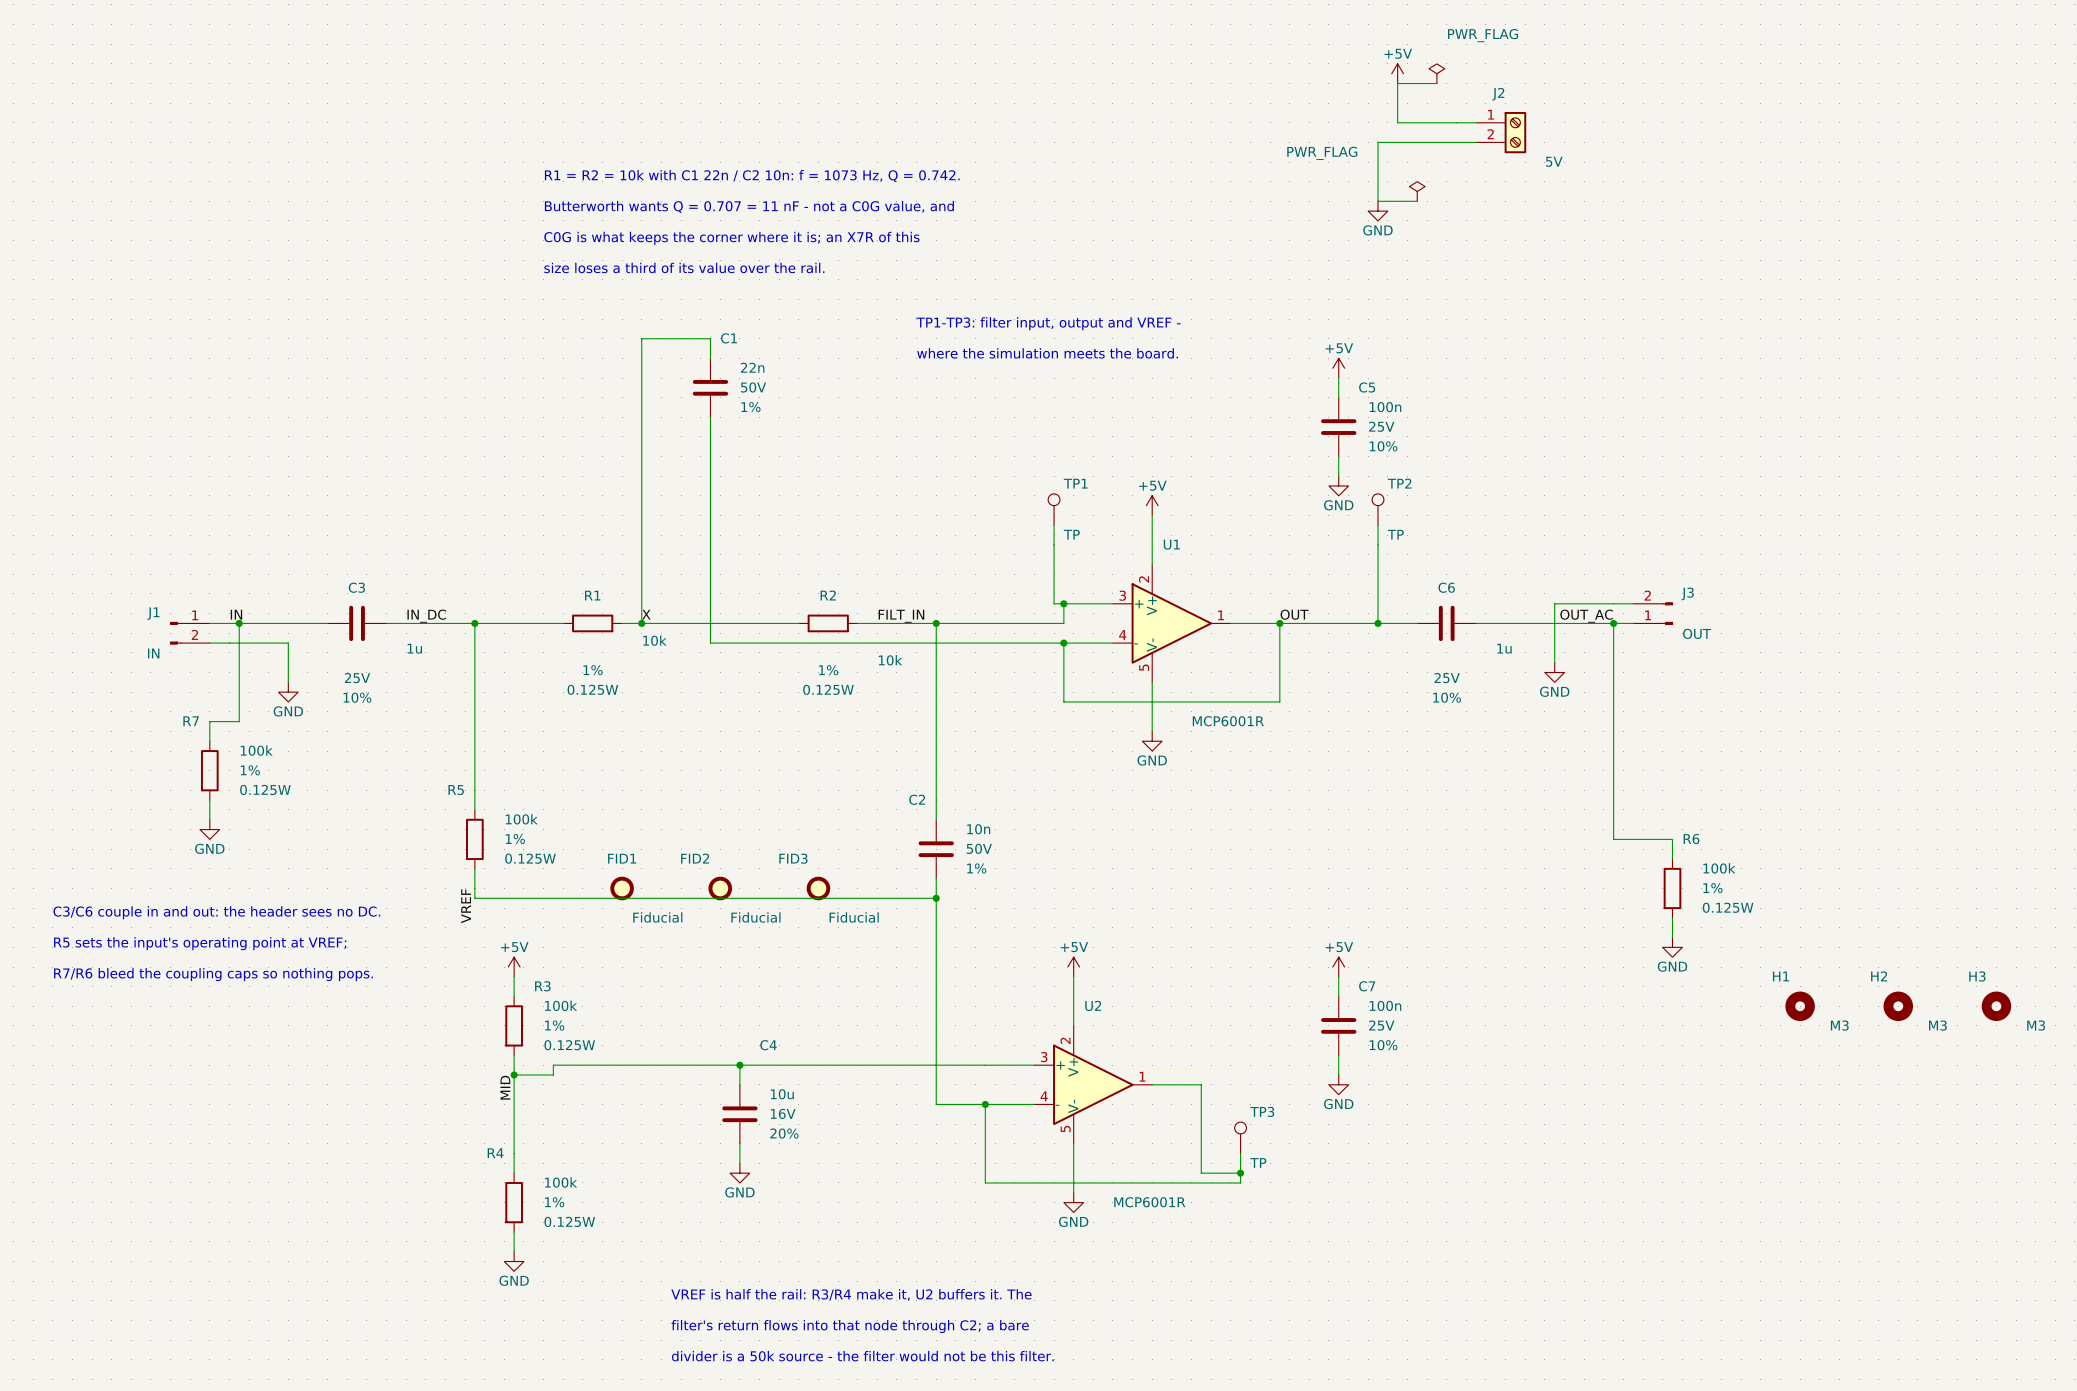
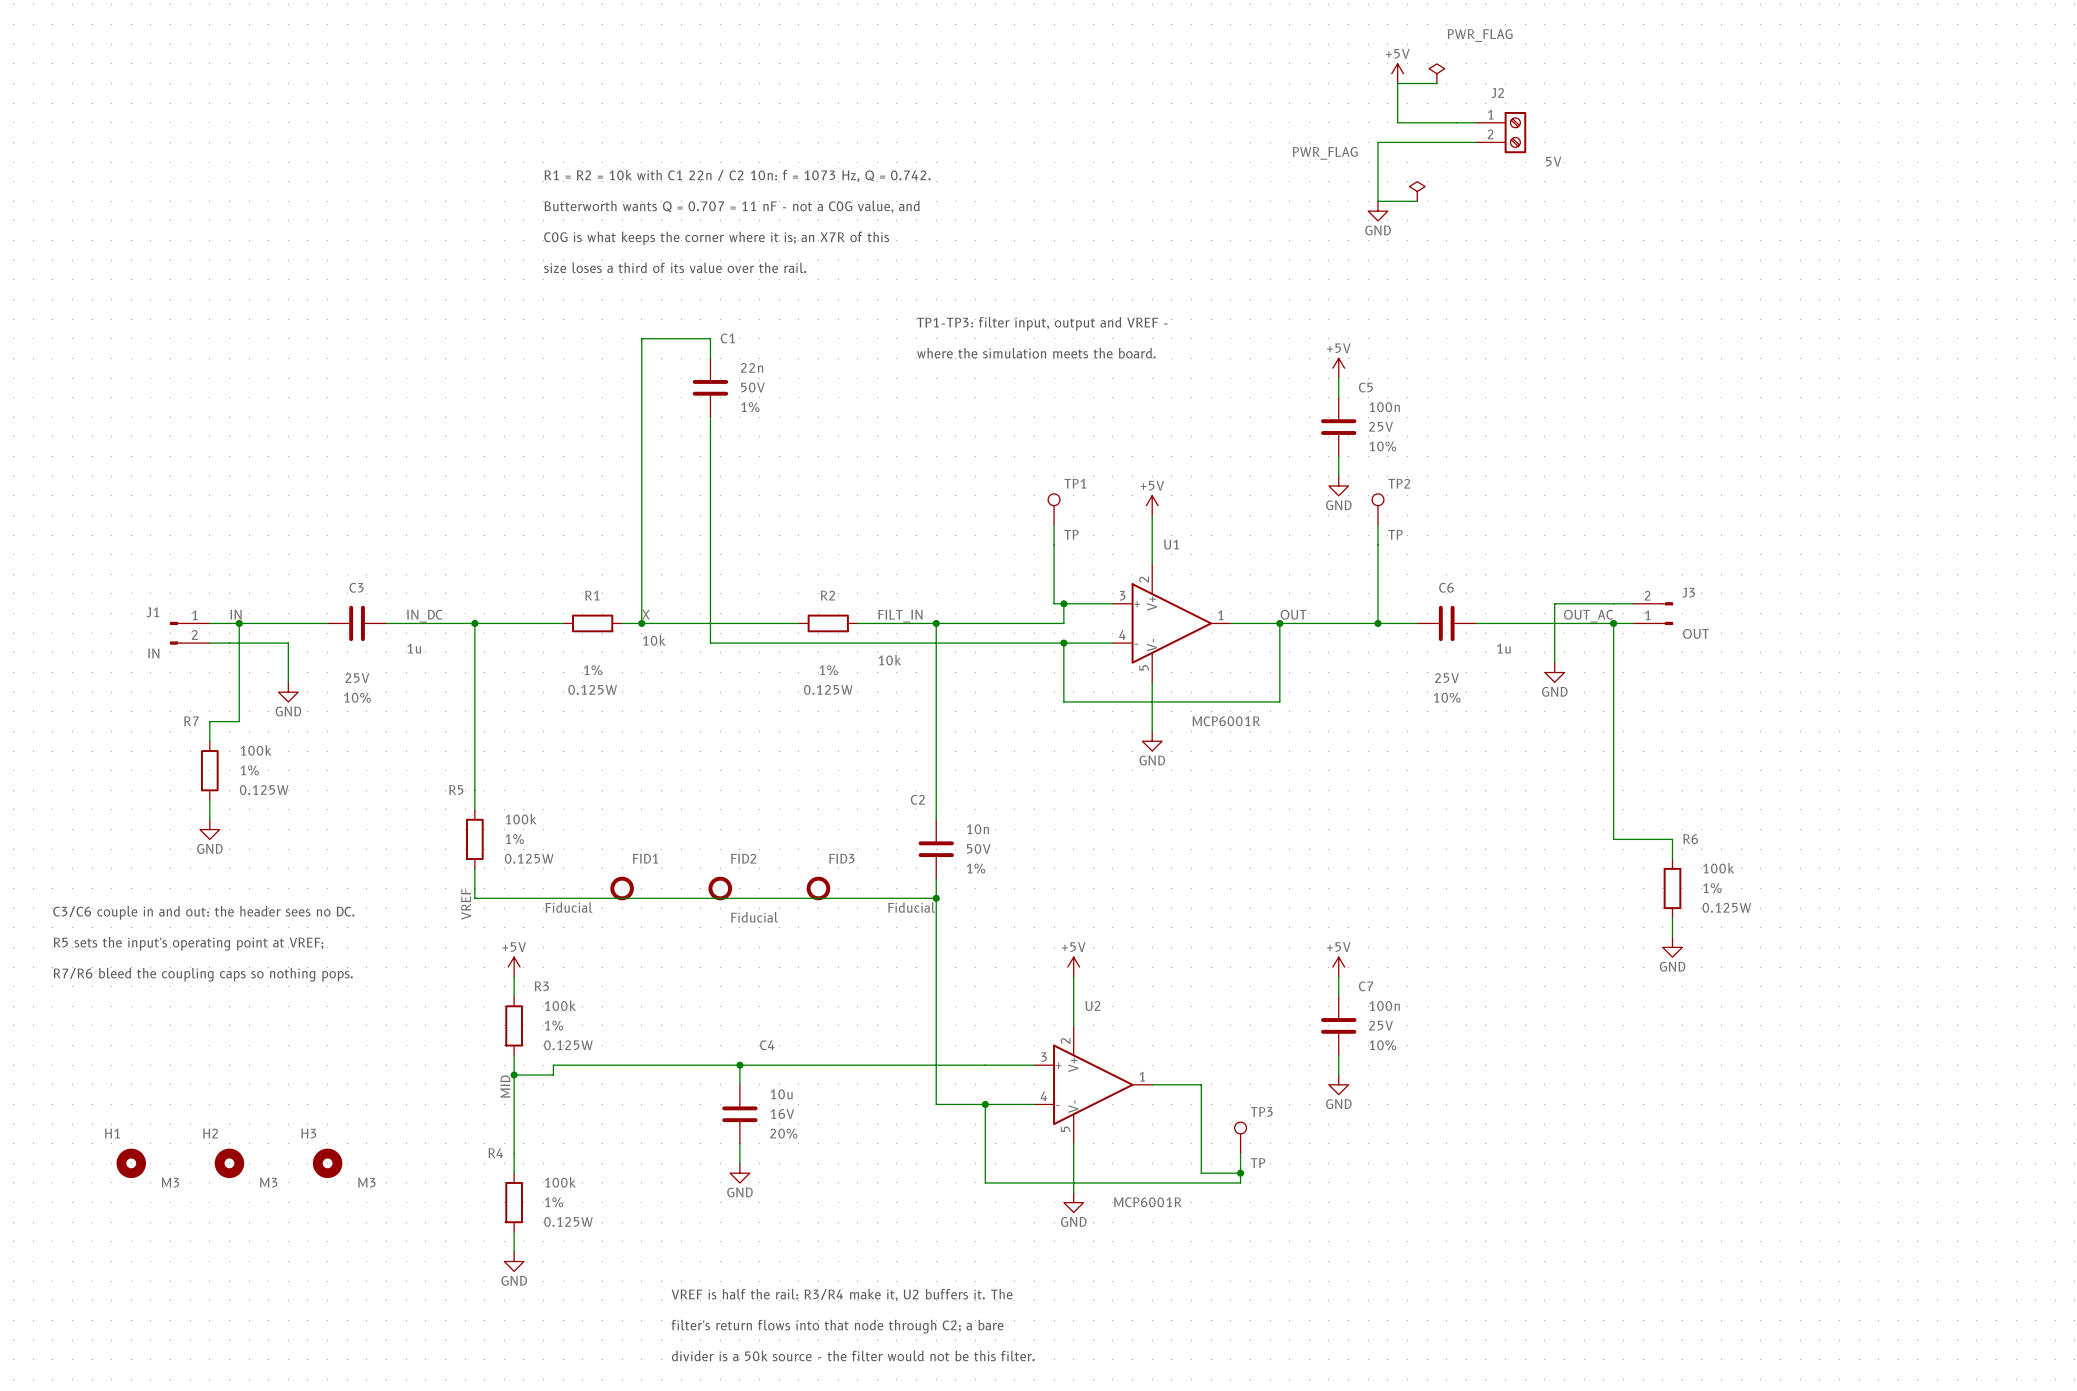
FID1 name position: FID1 (622, 858) -> FID1 (645, 858)
FID2 name position: FID2 (695, 858) -> FID2 (743, 858)
FID3 name position: FID3 (793, 858) -> FID3 (841, 858)
FID1 value position: Fiducial (657, 917) -> Fiducial (569, 907)
FID3 value position: Fiducial (854, 917) -> Fiducial (911, 907)
H1 position: (1800, 1006) -> (131, 1163)
H2 position: (1898, 1006) -> (229, 1163)
H3 position: (1996, 1006) -> (327, 1163)

